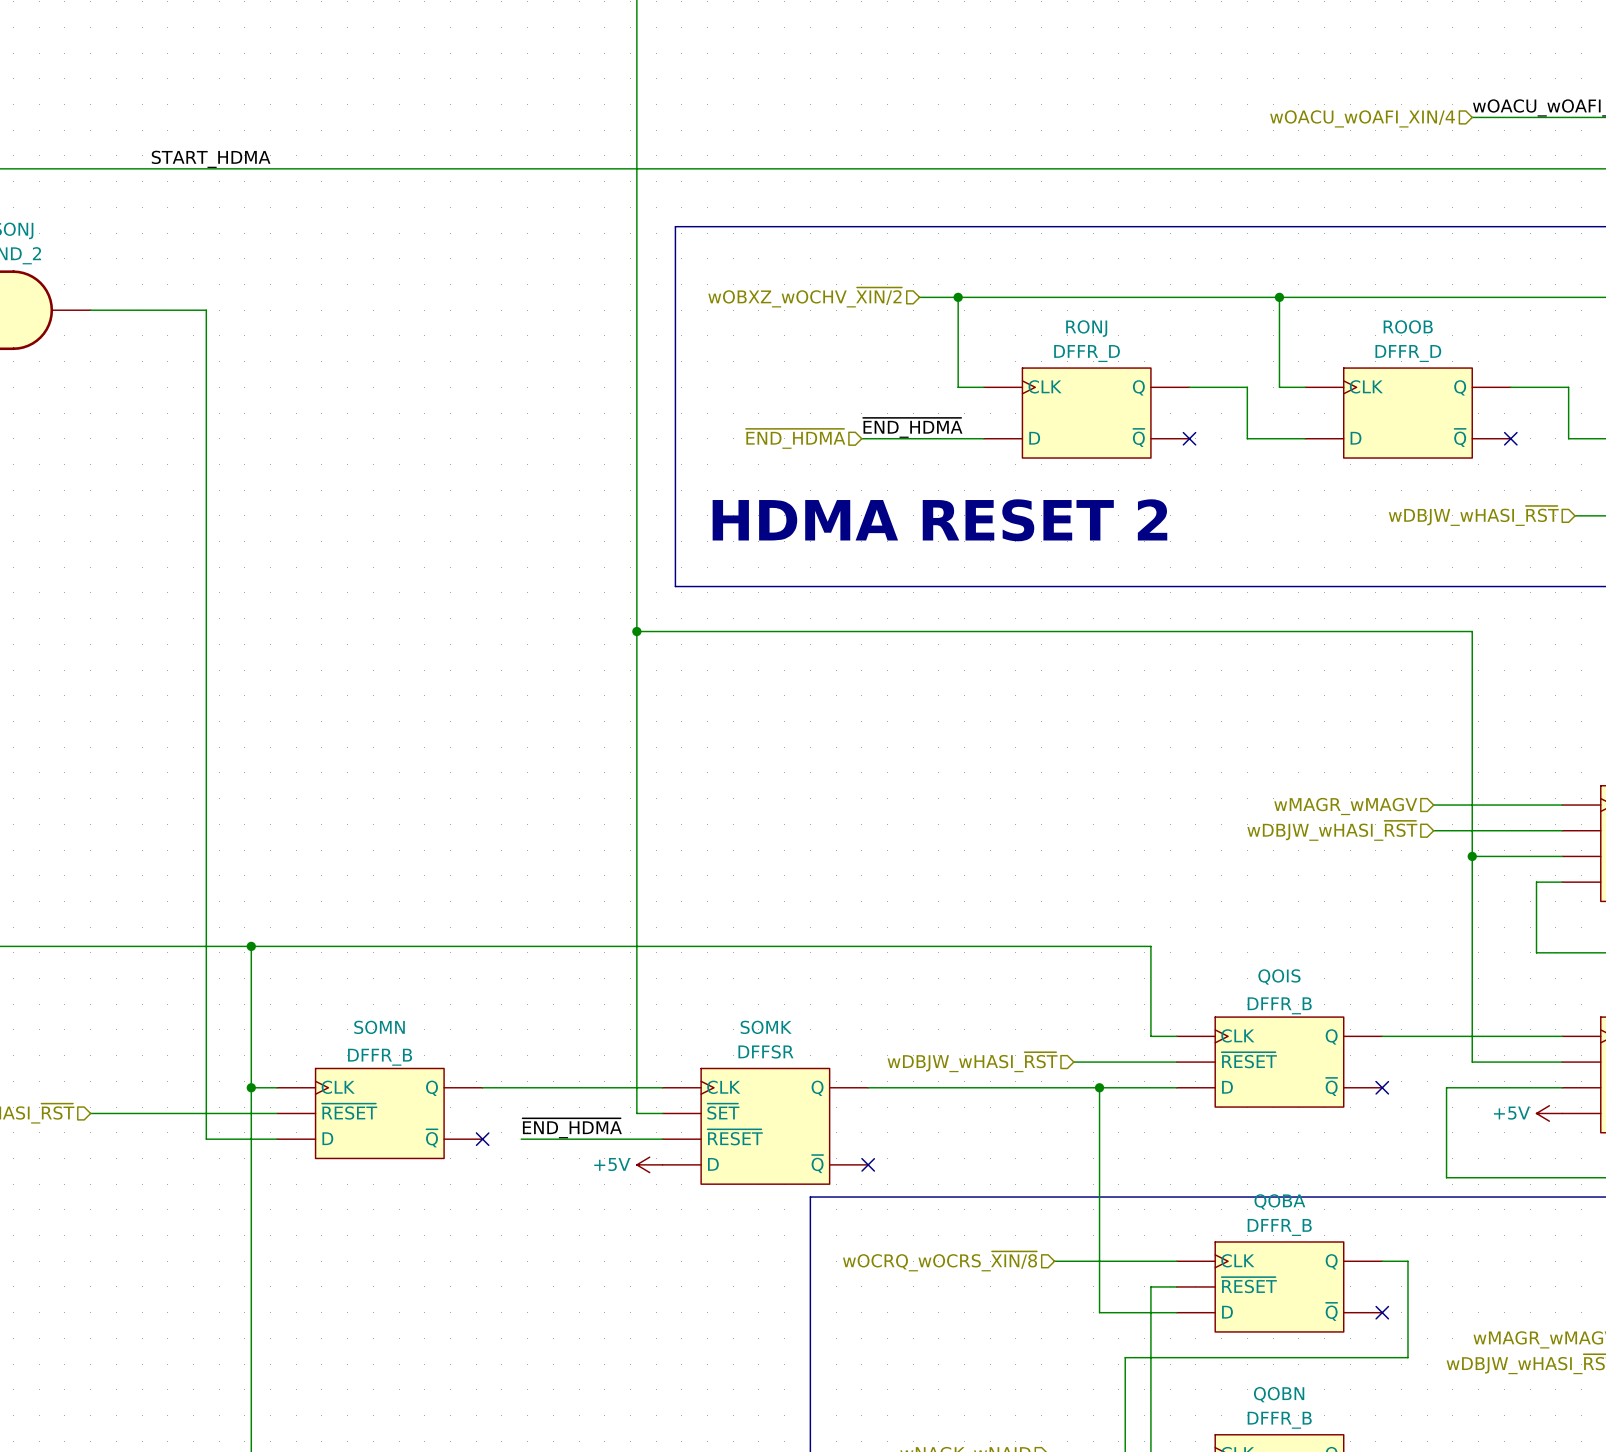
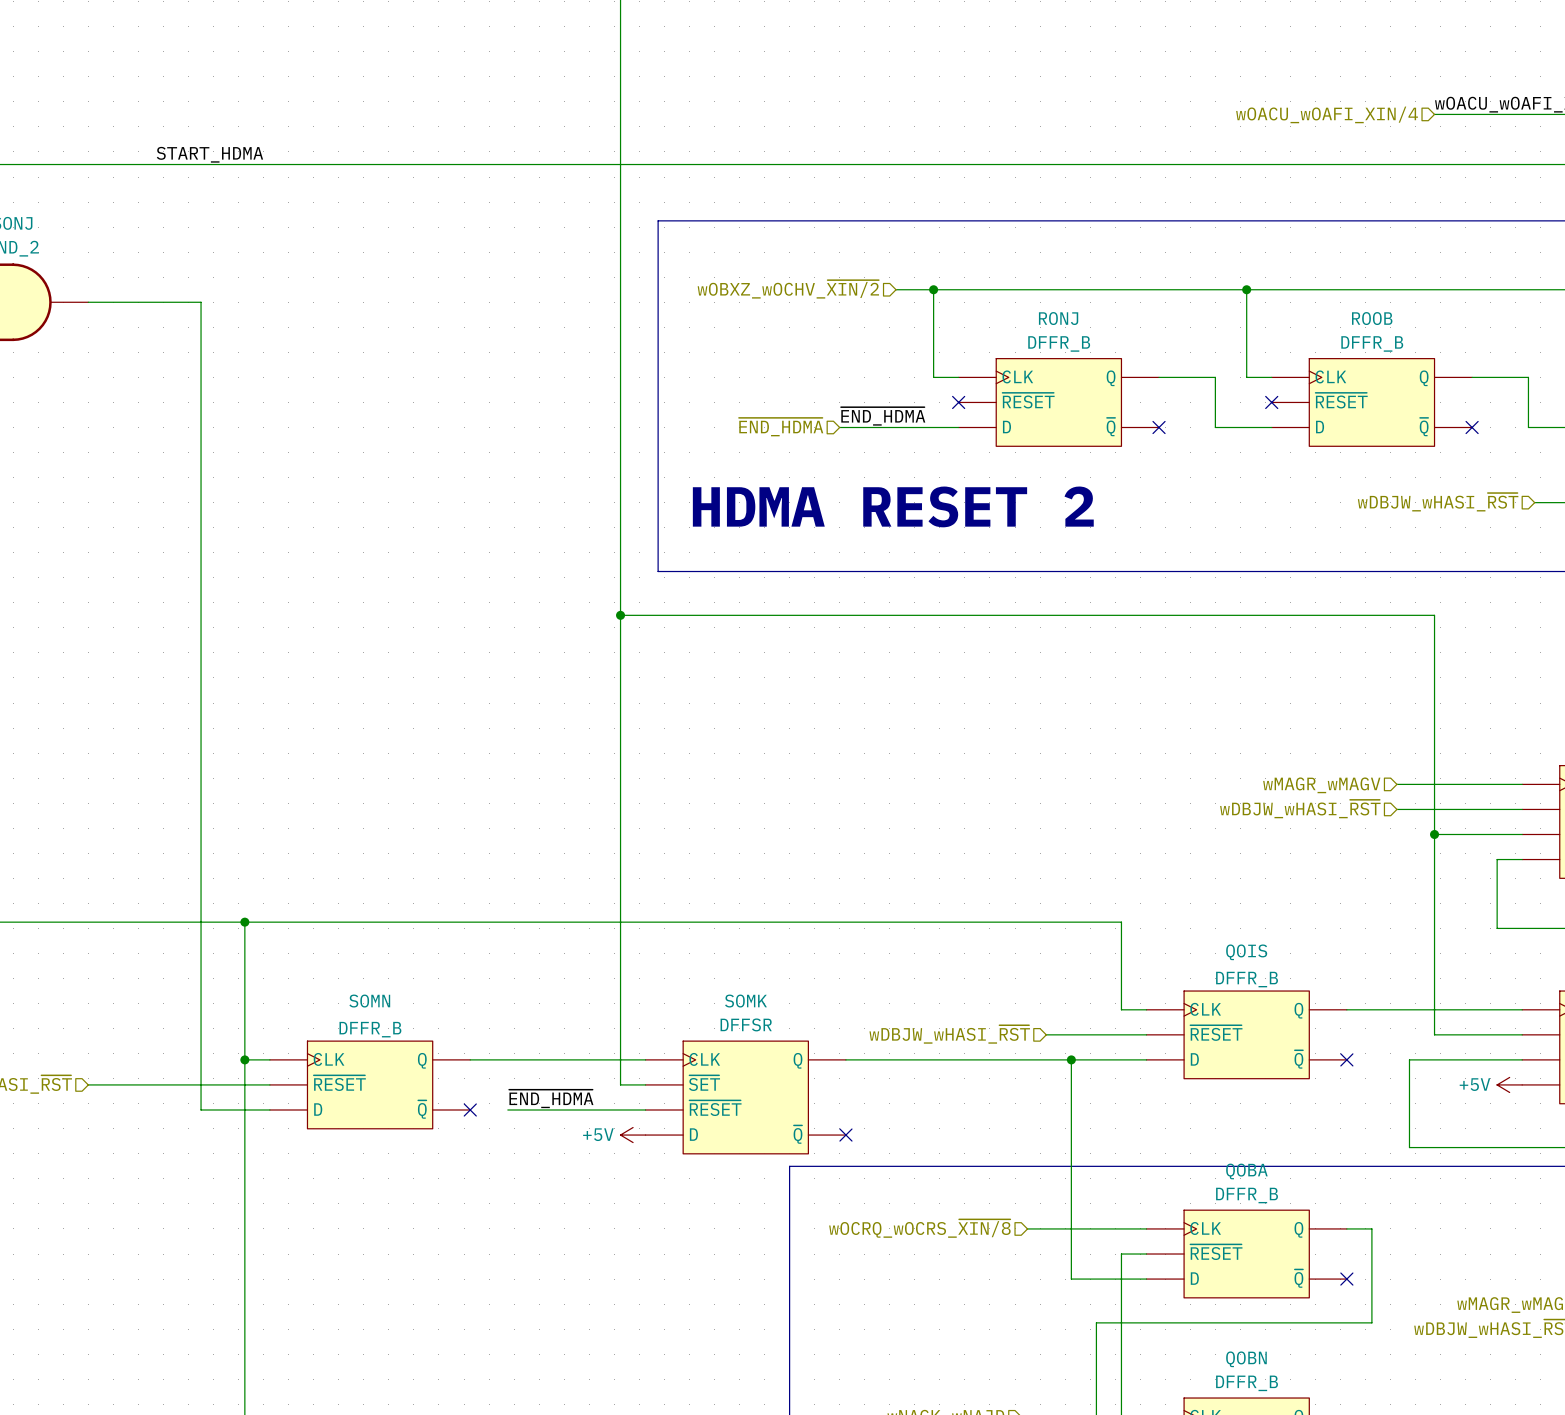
RONJ value: DFFR_D (1087, 353) -> DFFR_B (1059, 343)
ROOB value: DFFR_D (1408, 353) -> DFFR_B (1372, 343)
RONJ symbol: [983, 368, 1190, 459] -> [958, 358, 1160, 447]
ROOB symbol: [1305, 368, 1511, 459] -> [1271, 358, 1473, 447]
no-connect mark: none -> (958, 402)
no-connect mark: none -> (1271, 402)

